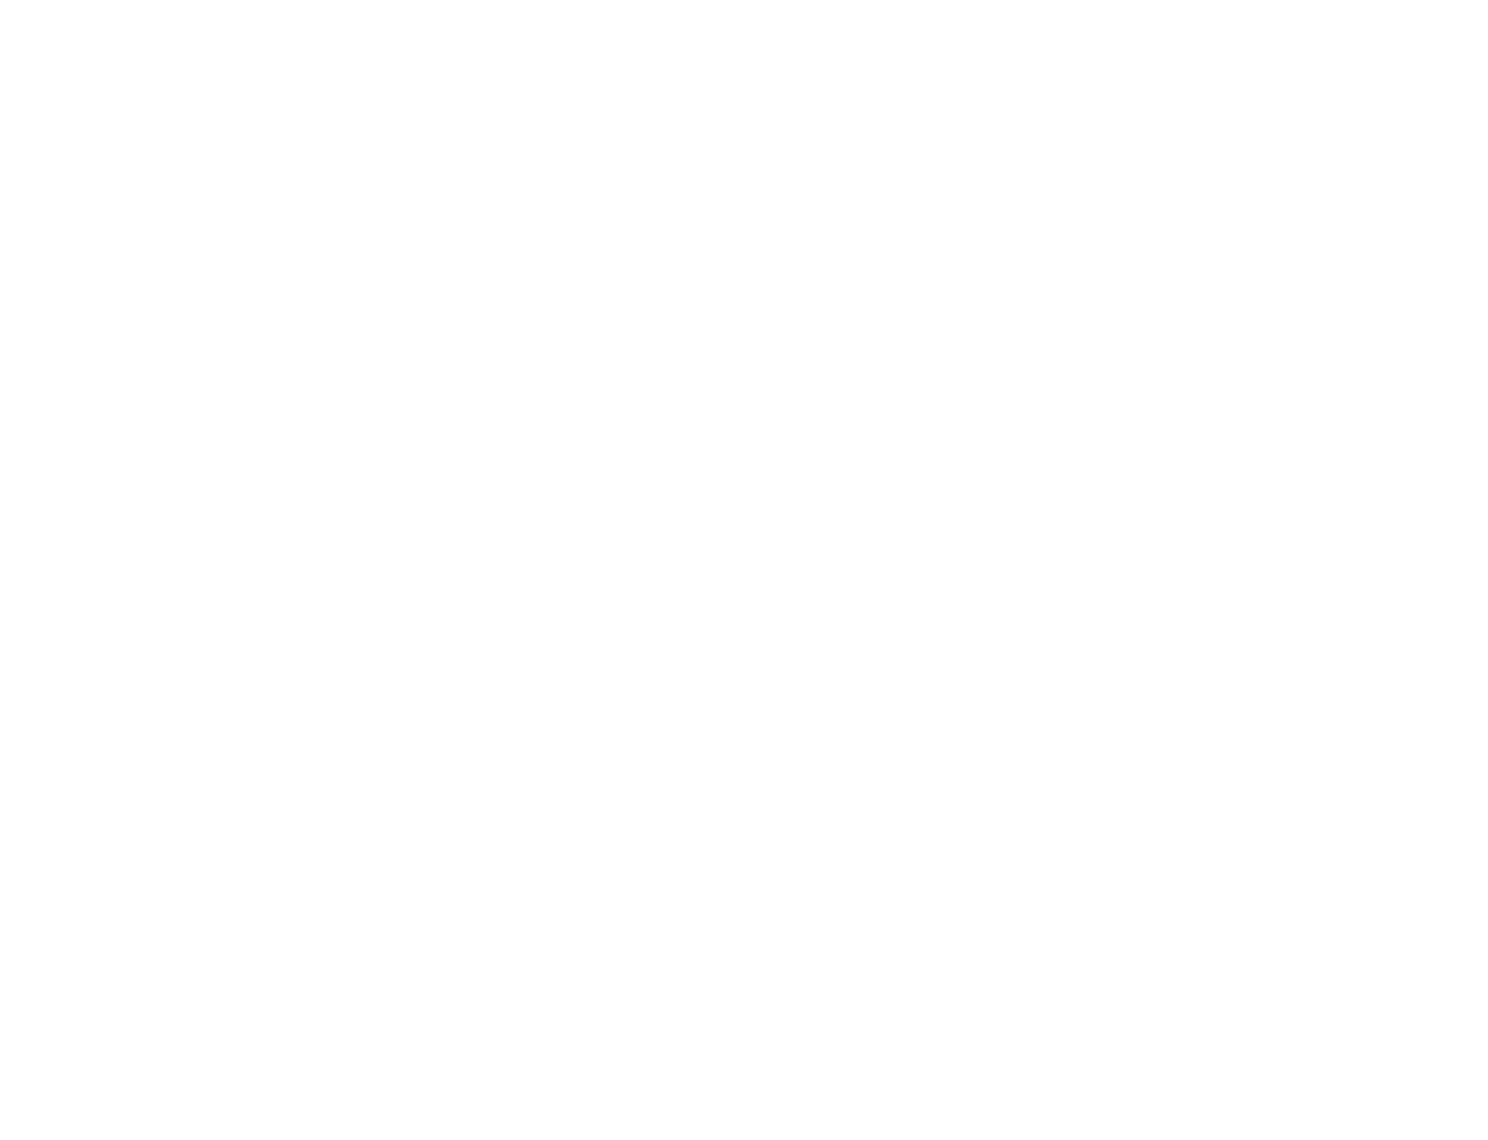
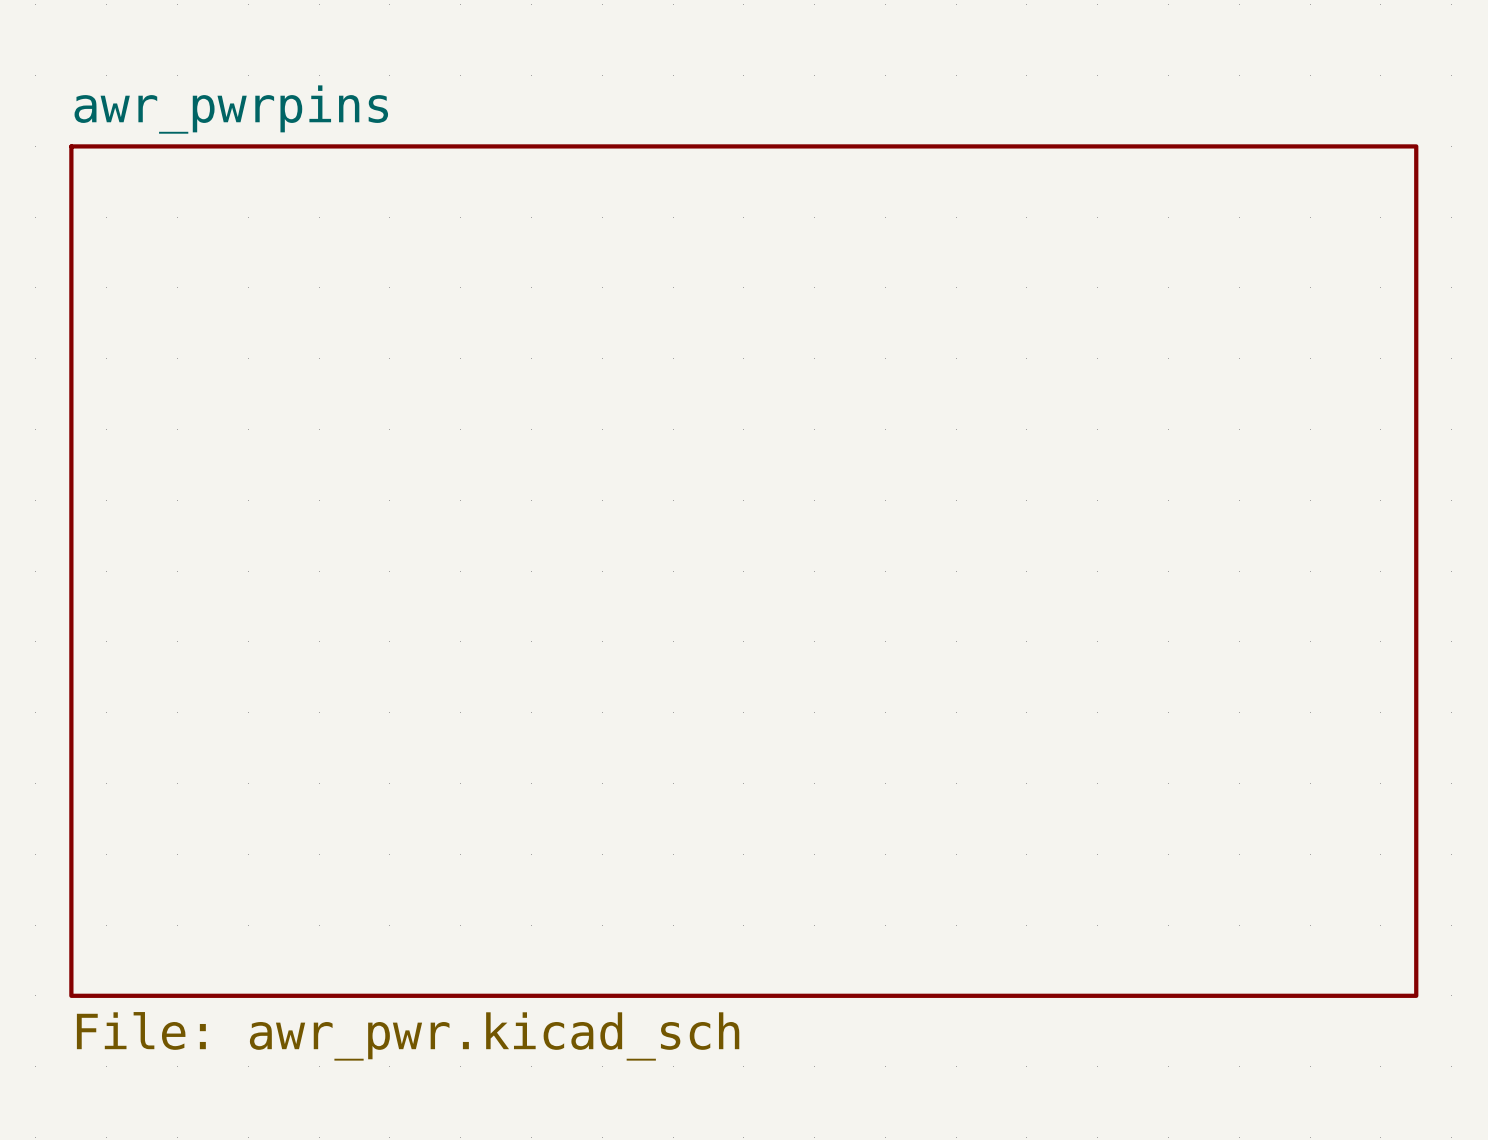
sheet awr_pwrpins: none -> File: awr_pwr.kicad_sch (743, 571)

